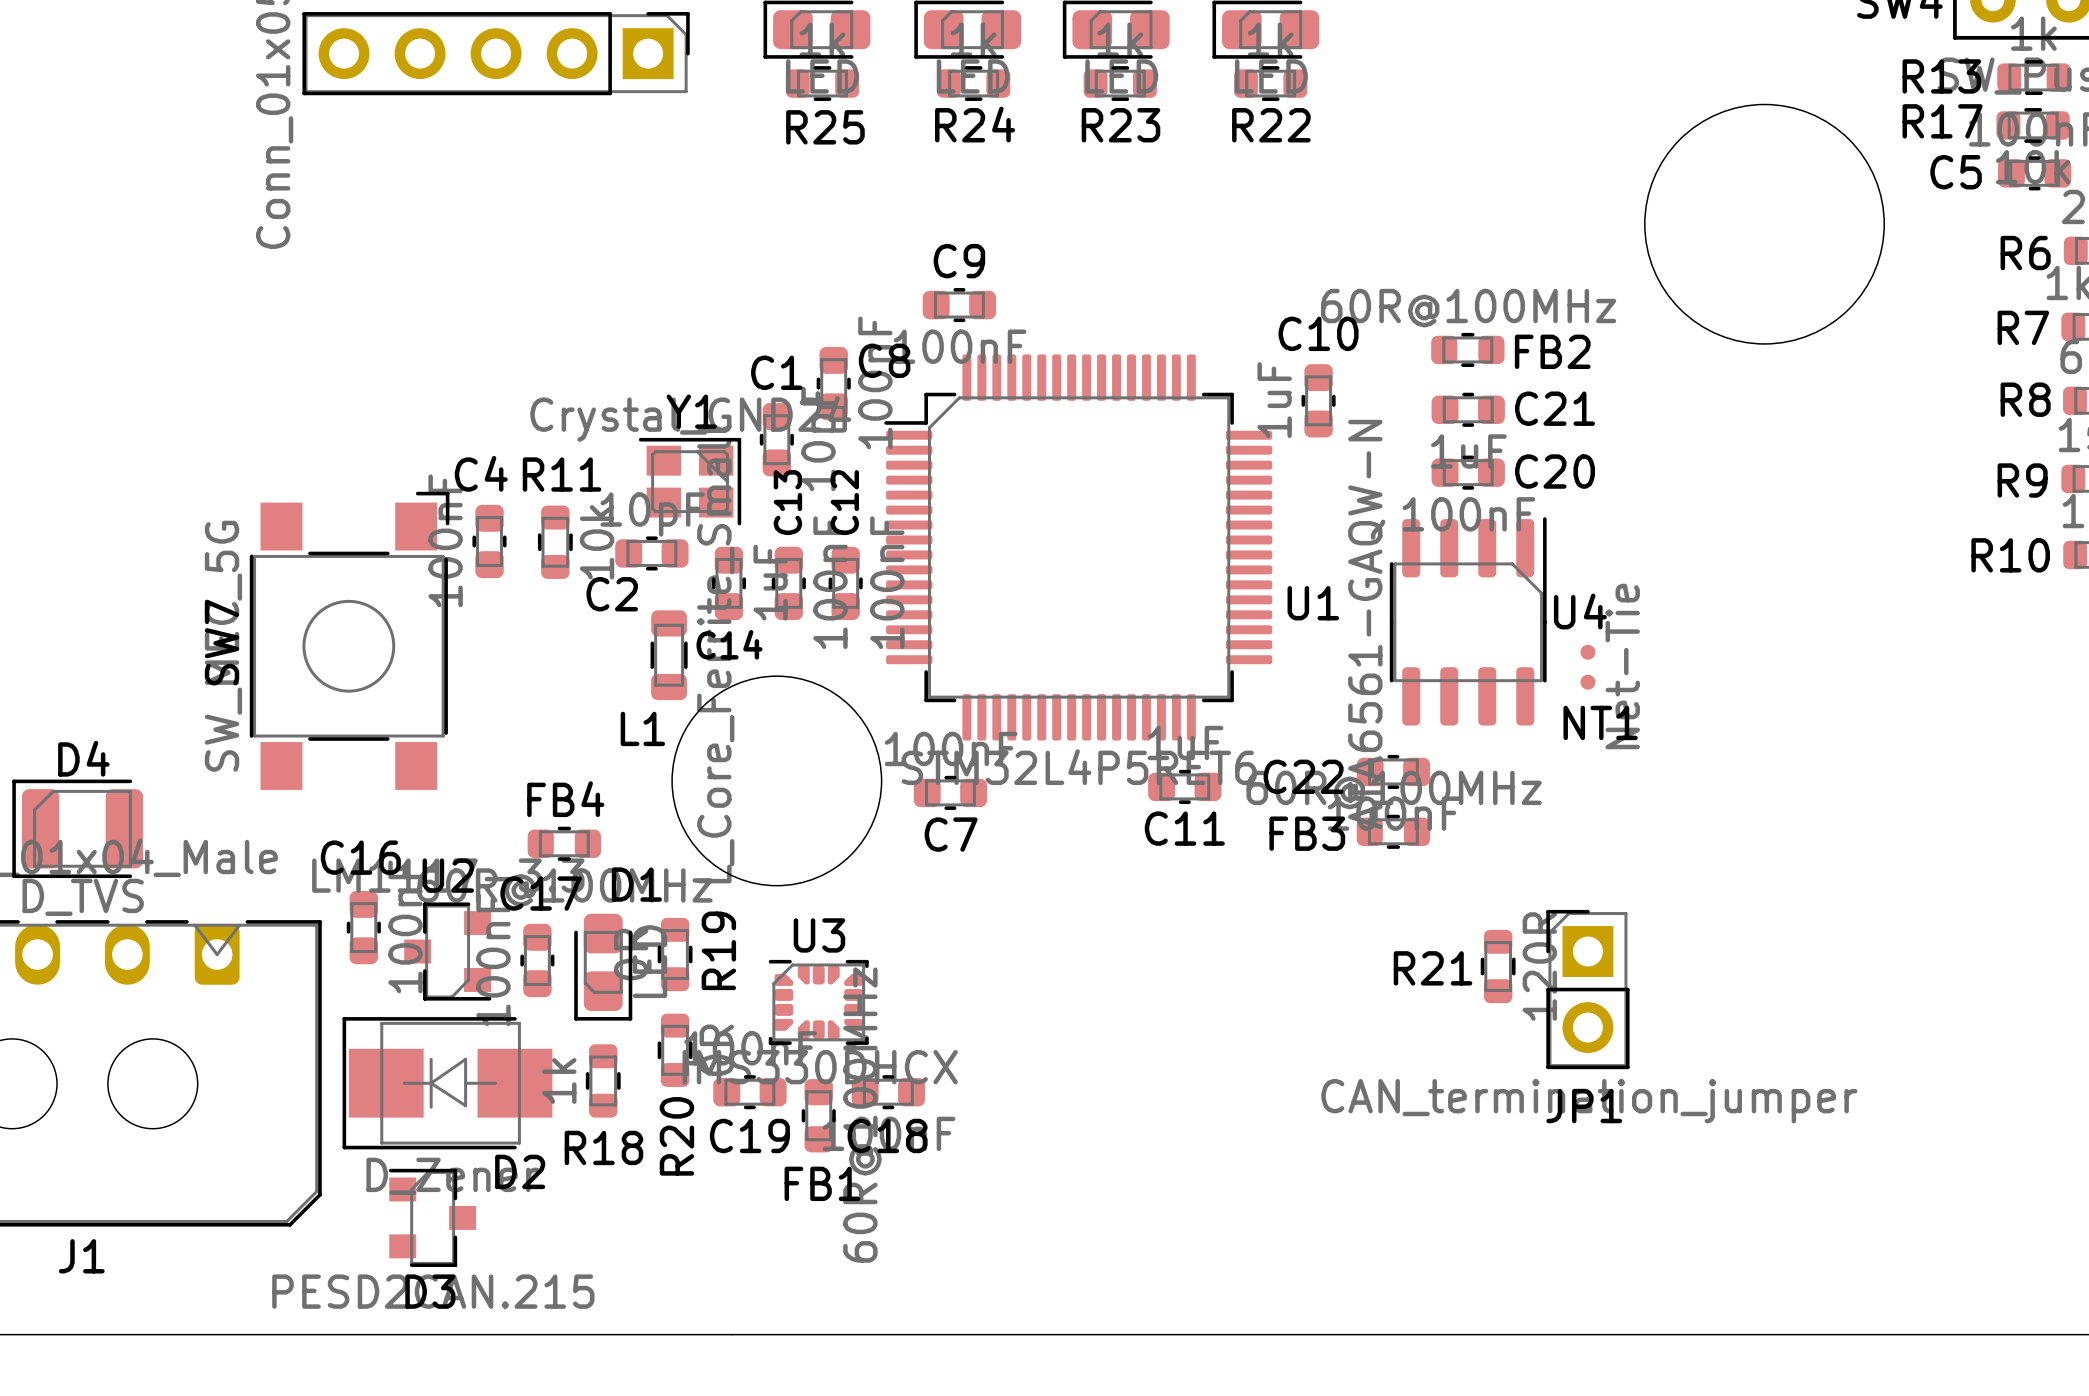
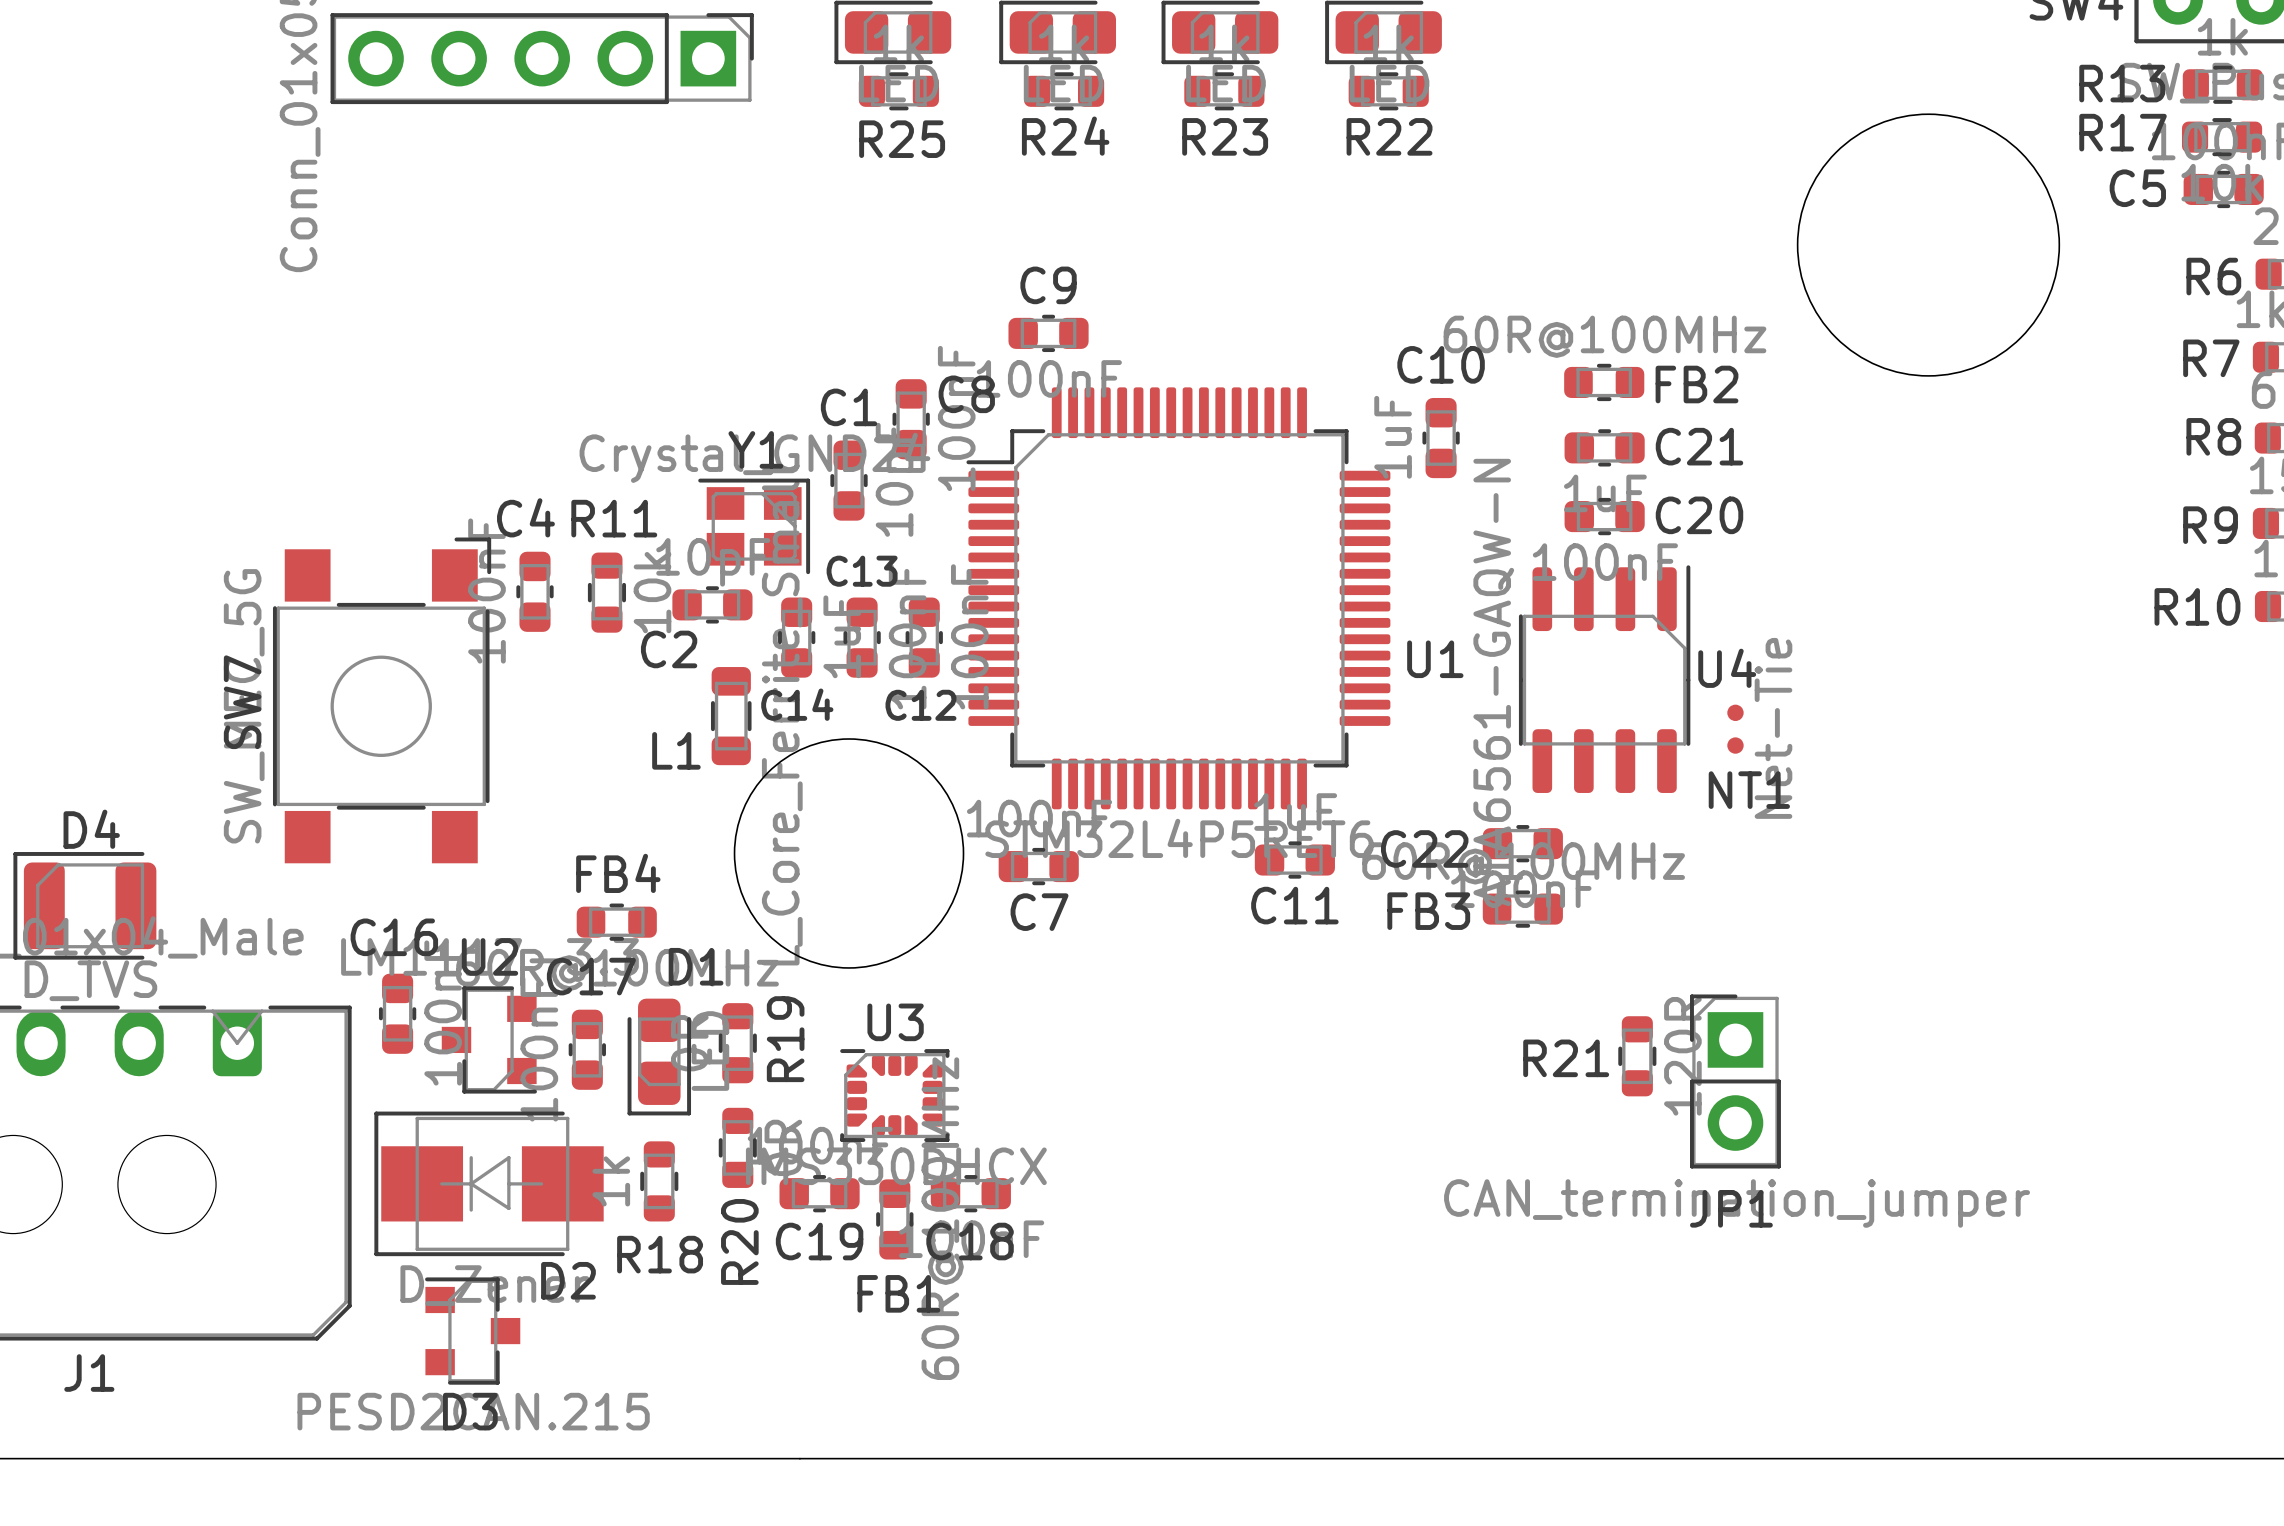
C13 name rotation: 0° (787, 502) -> 90° clockwise (862, 571)
C12 name rotation: 0° (844, 502) -> 90° clockwise (920, 705)
C12 name position: C12 (844, 502) -> C12 (920, 705)
L1 name position: L1 (642, 728) -> L1 (676, 750)

